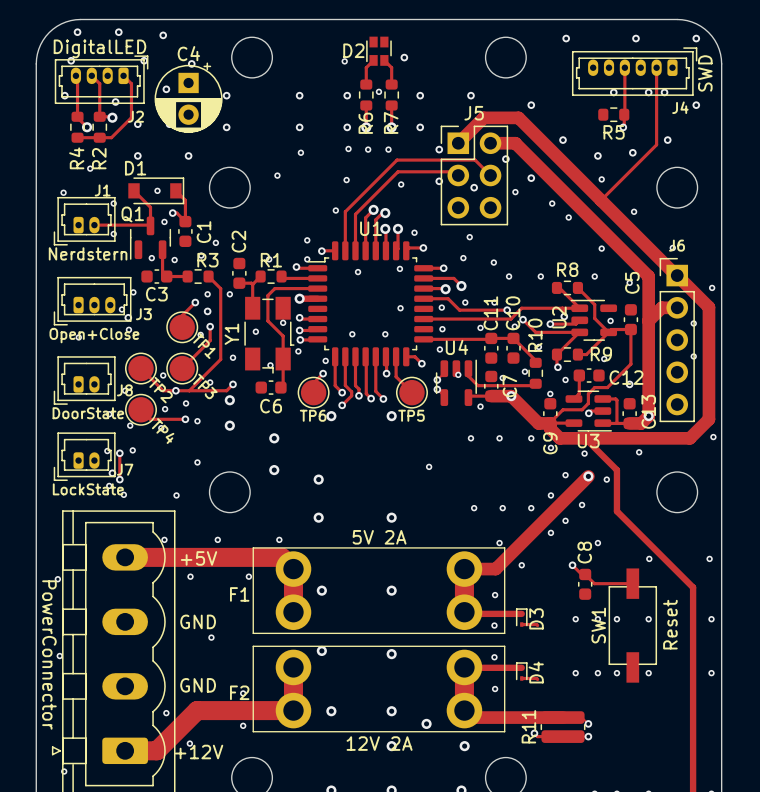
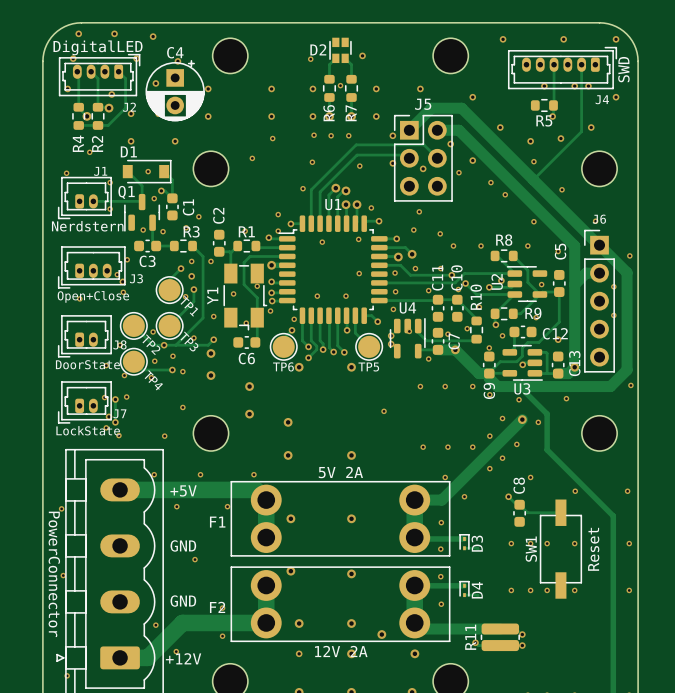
via: none -> (299, 653)

